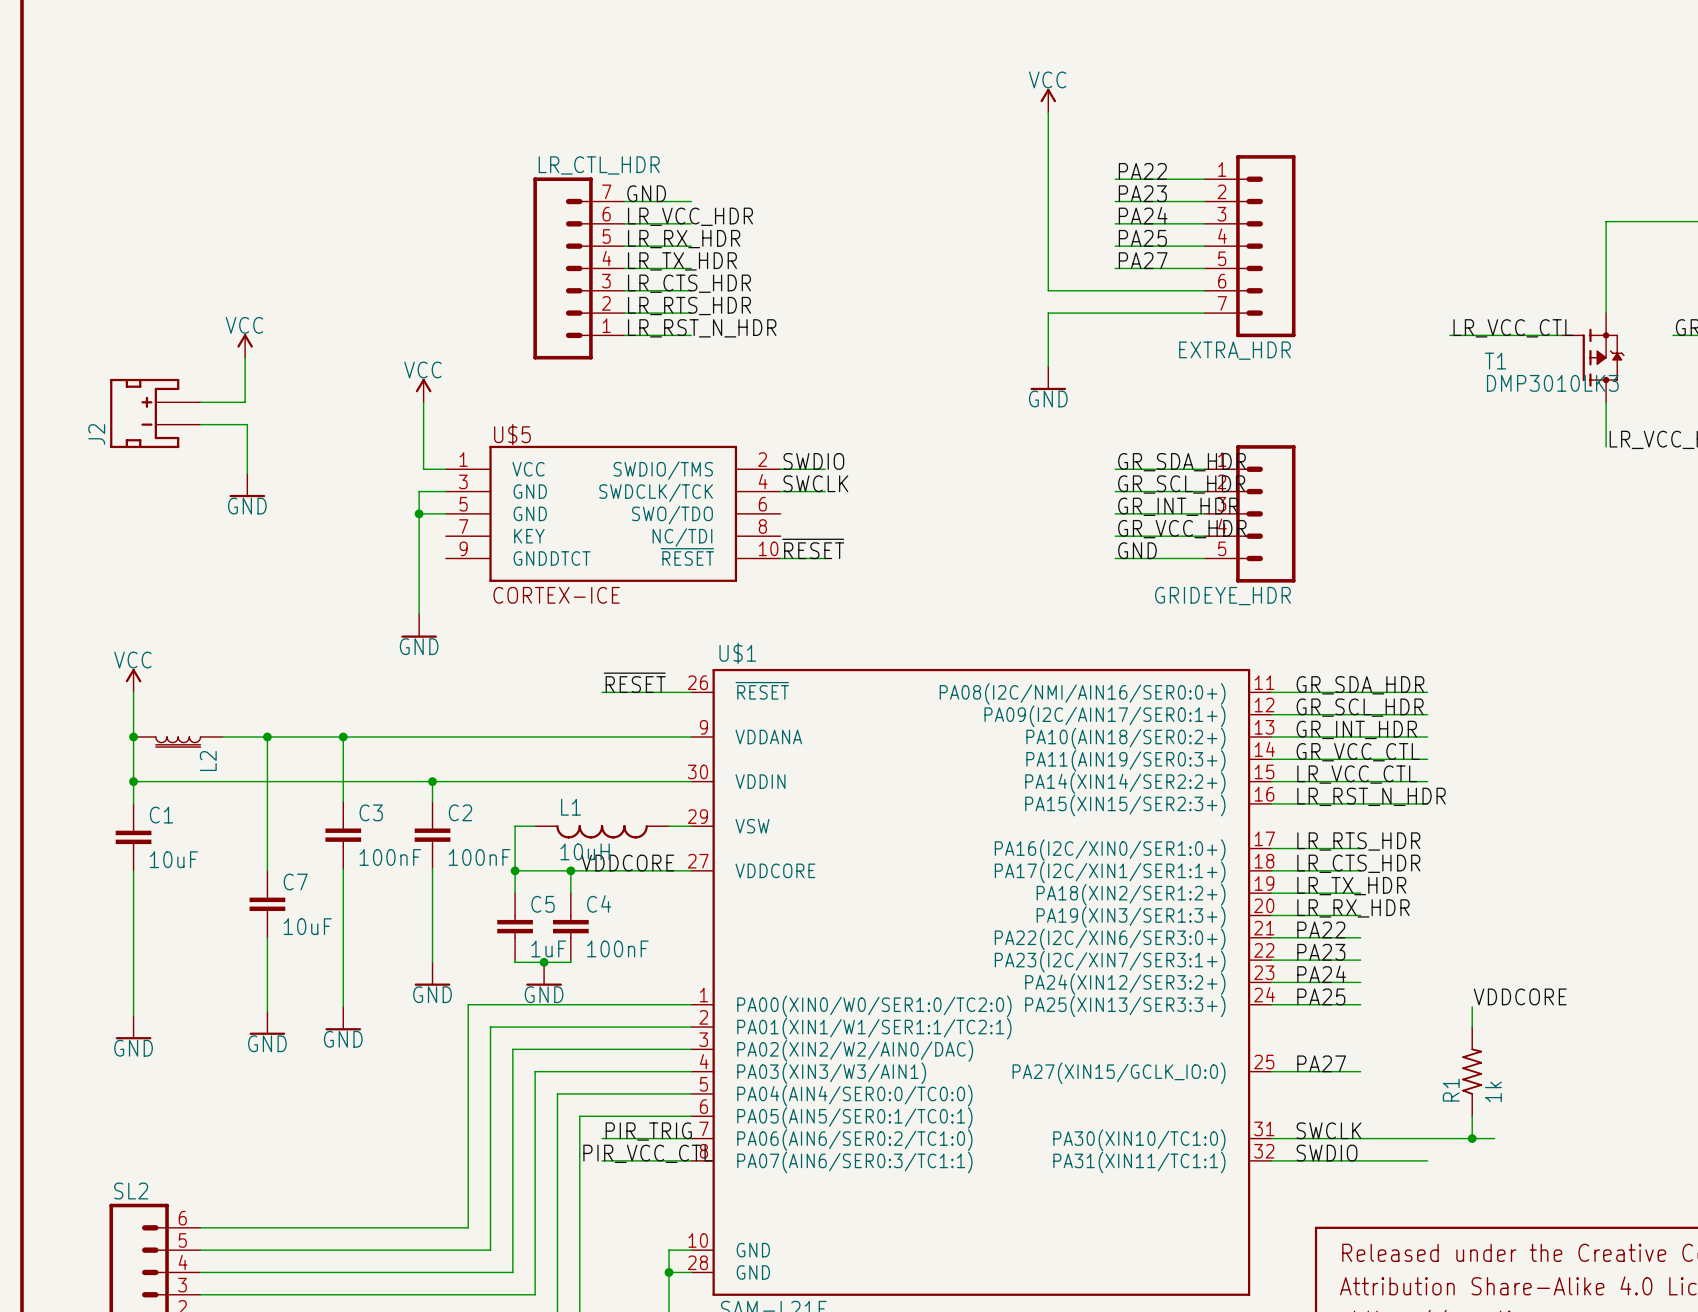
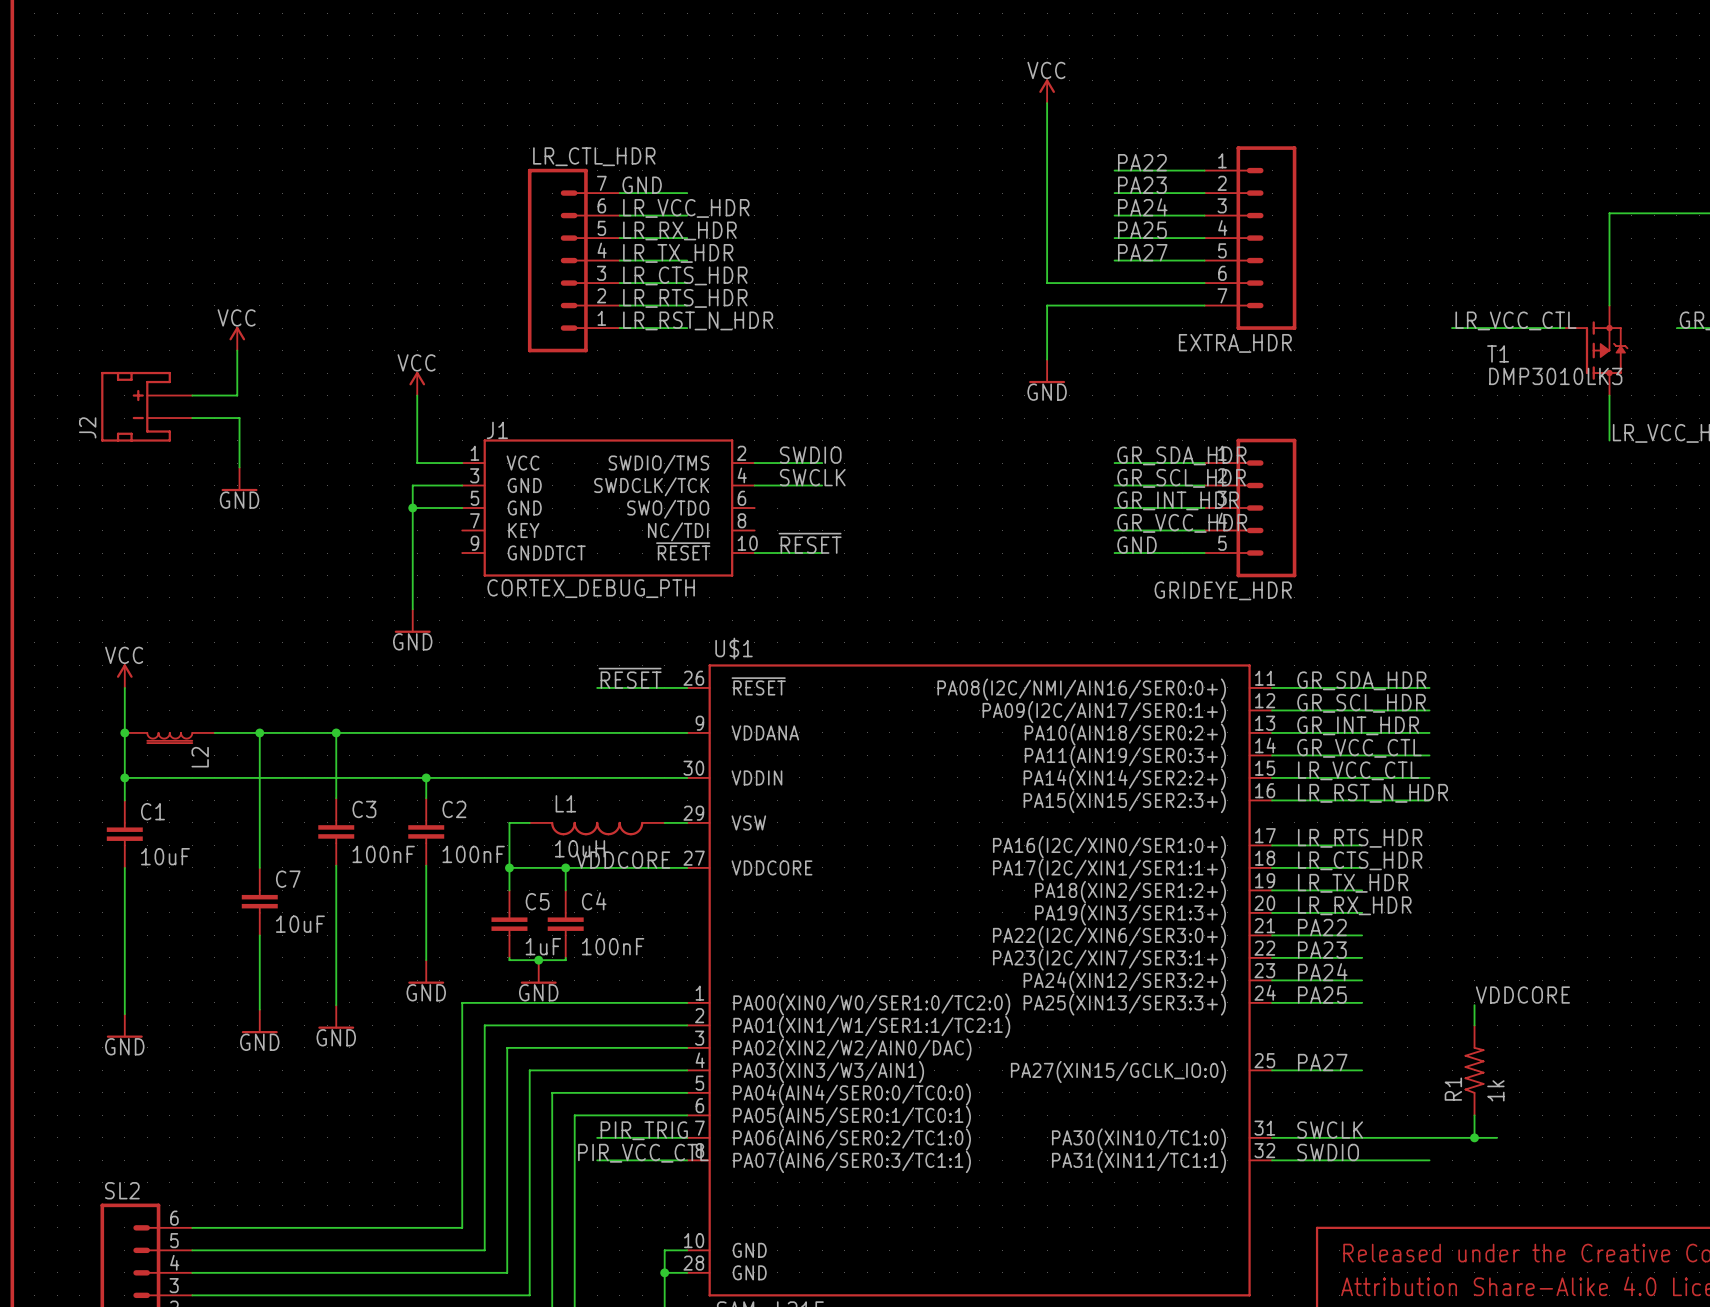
U$5: CORTEX-ICE (613, 513) -> none
J1: none -> CORTEX_DEBUG_PTH (608, 508)

